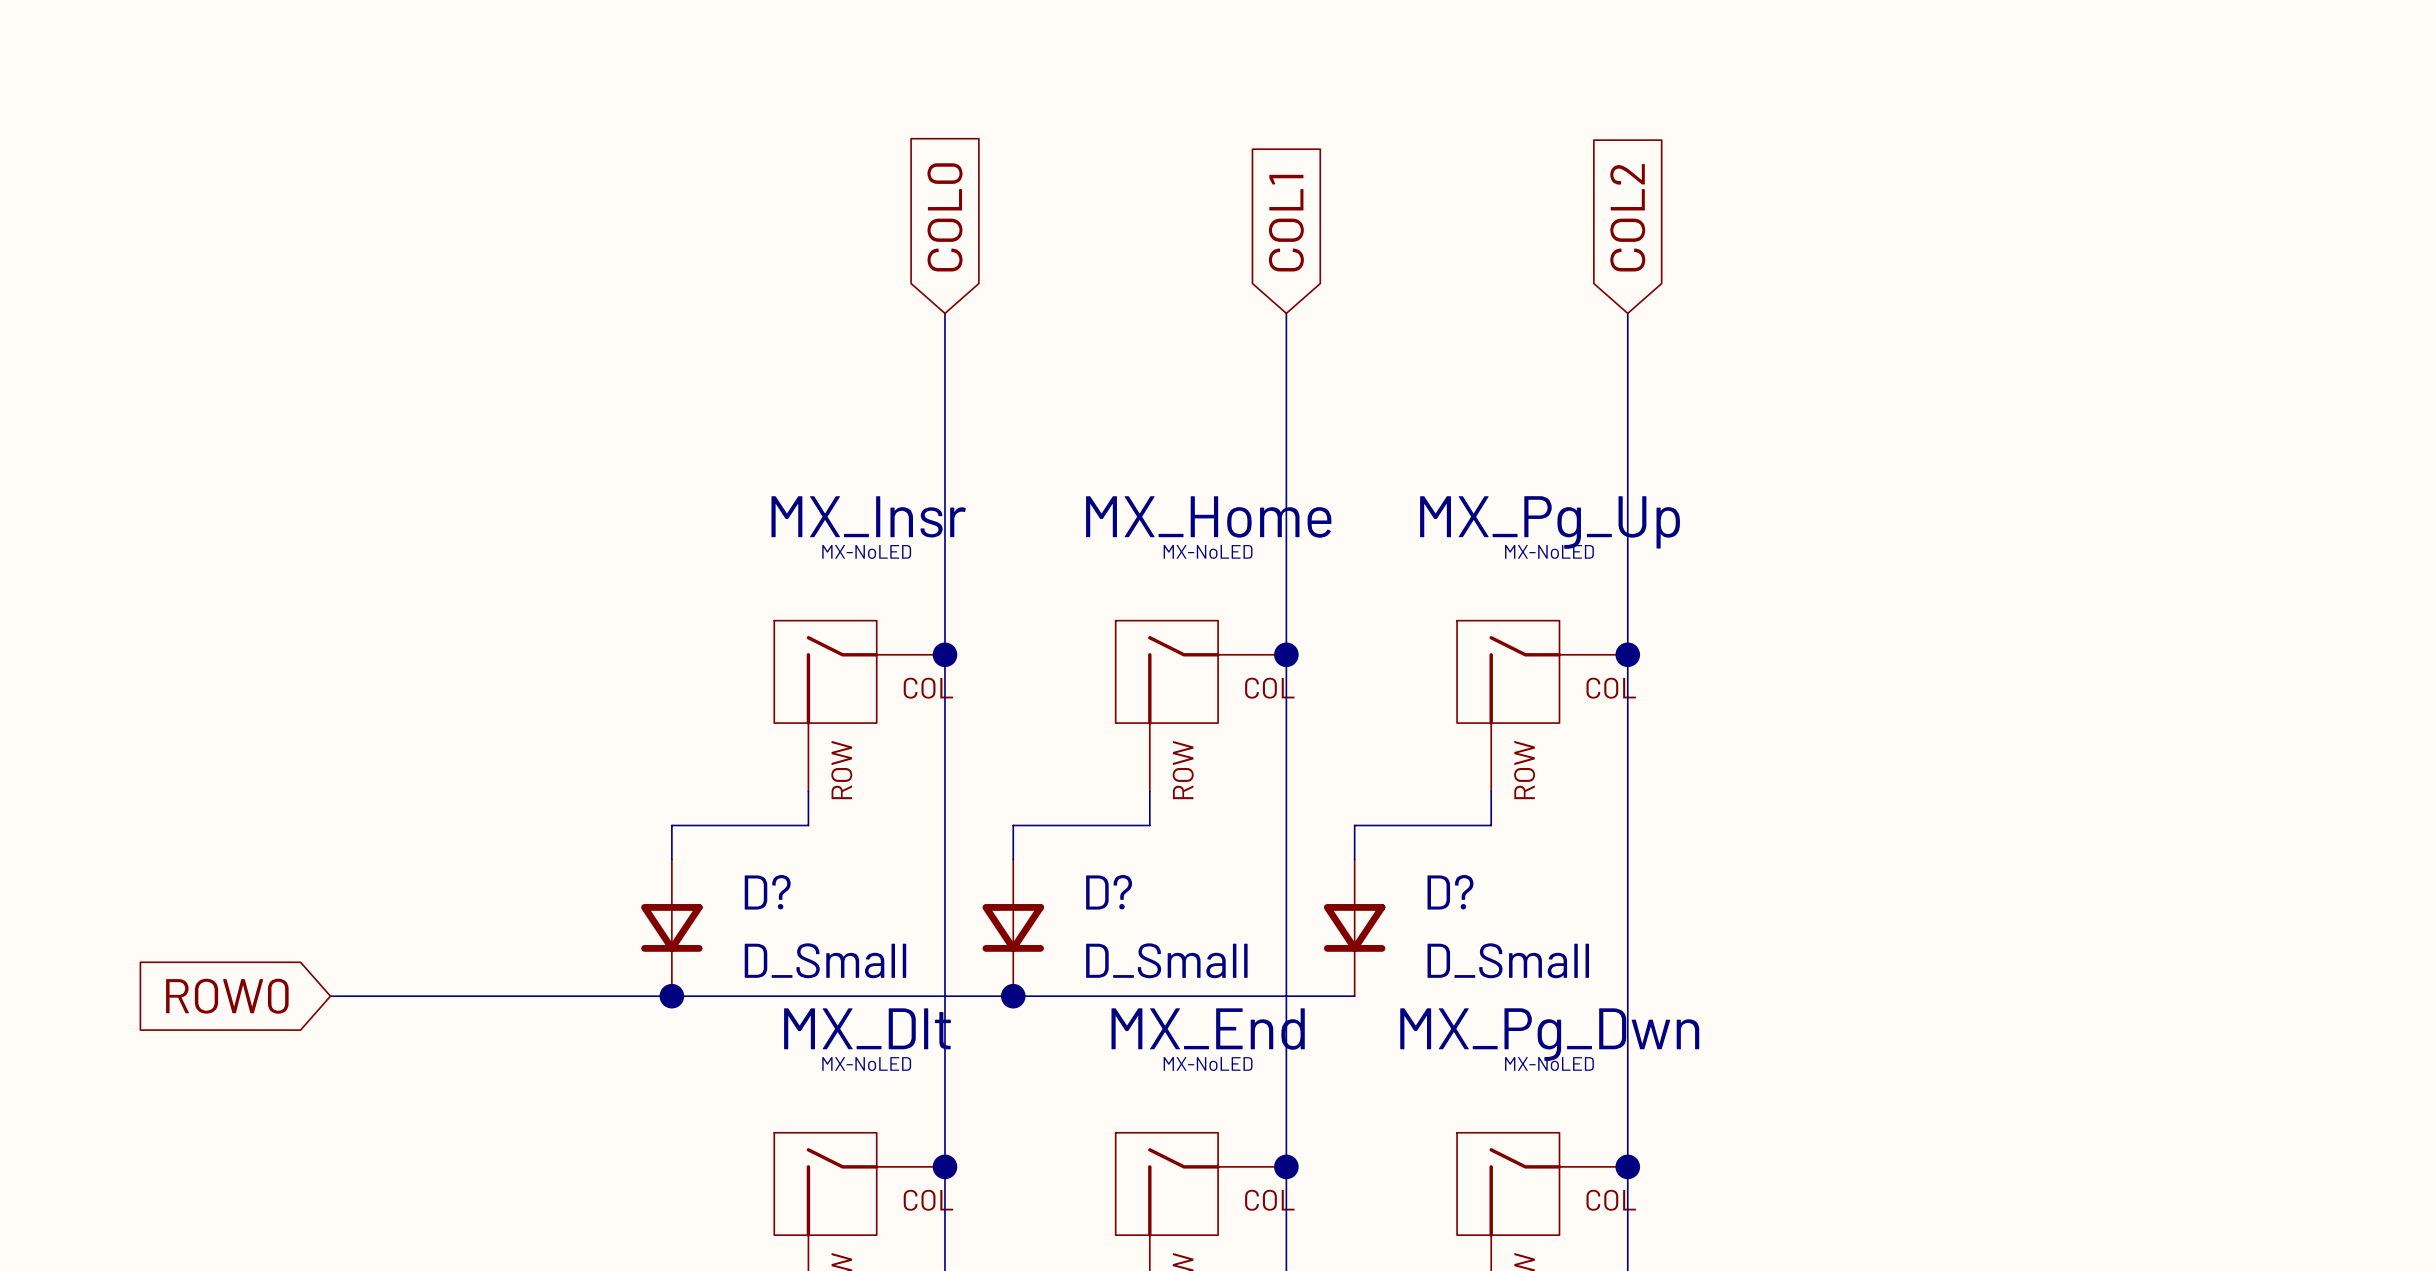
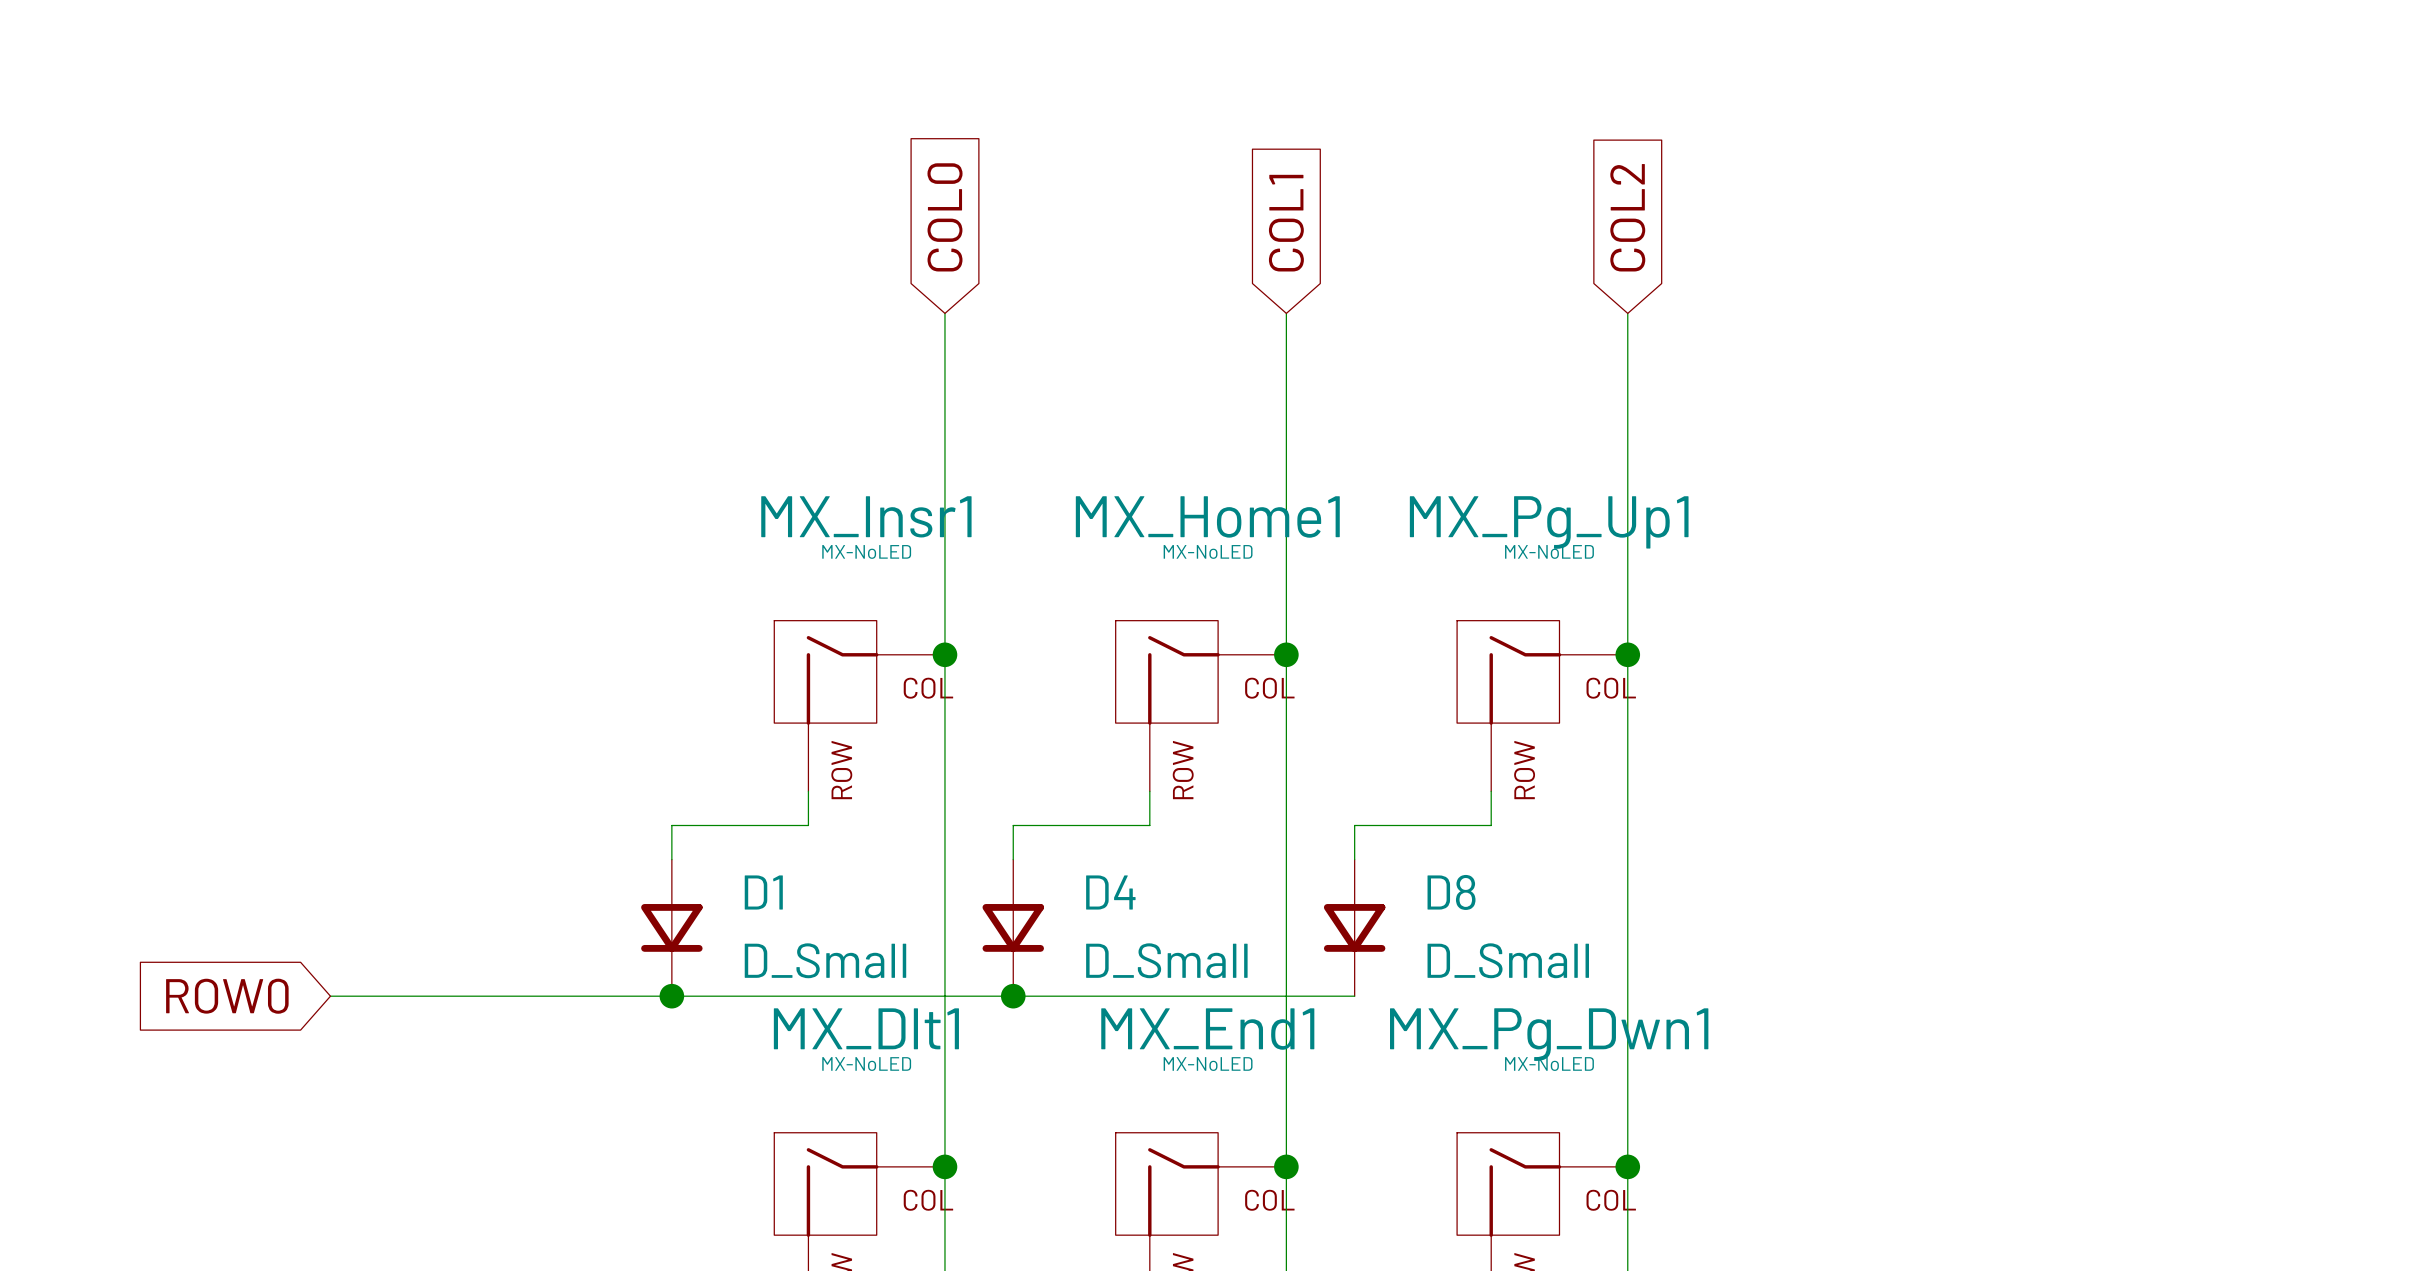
MX_Insr name: MX_Insr (868, 516) -> MX_Insr1 (866, 516)
MX_Home name: MX_Home (1208, 516) -> MX_Home1 (1207, 516)
MX_Pg_Up name: MX_Pg_Up (1550, 522) -> MX_Pg_Up1 (1549, 522)
D? name: D? (767, 892) -> D1 (763, 892)
D? name: D? (1109, 892) -> D4 (1110, 892)
D? name: D? (1450, 892) -> D8 (1451, 892)
MX_Dlt name: MX_Dlt (867, 1028) -> MX_Dlt1 (866, 1028)
MX_End name: MX_End (1208, 1029) -> MX_End1 (1207, 1029)
MX_Pg_Dwn name: MX_Pg_Dwn (1549, 1034) -> MX_Pg_Dwn1 (1549, 1034)

